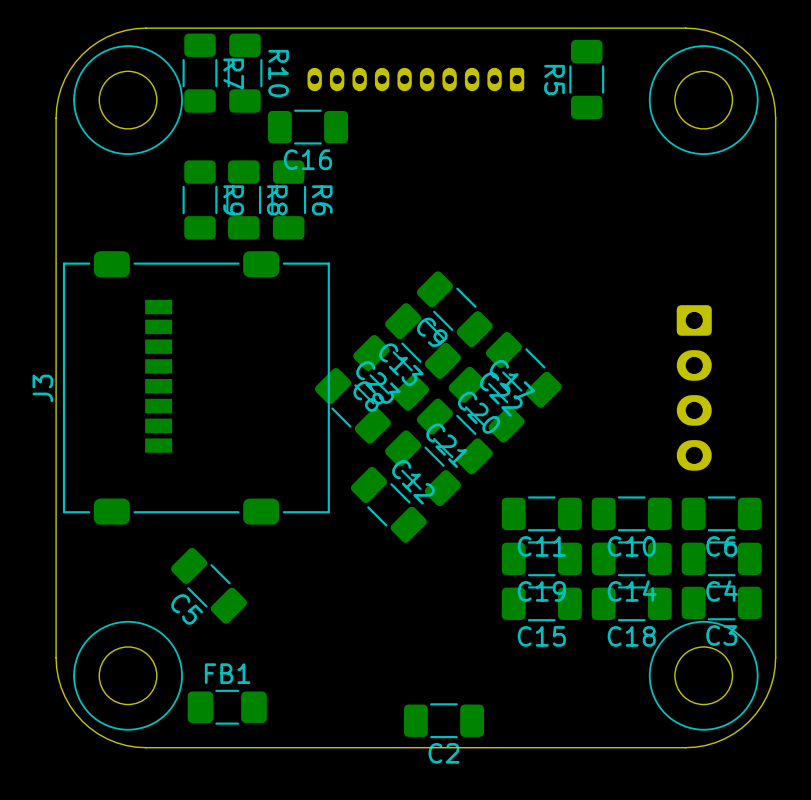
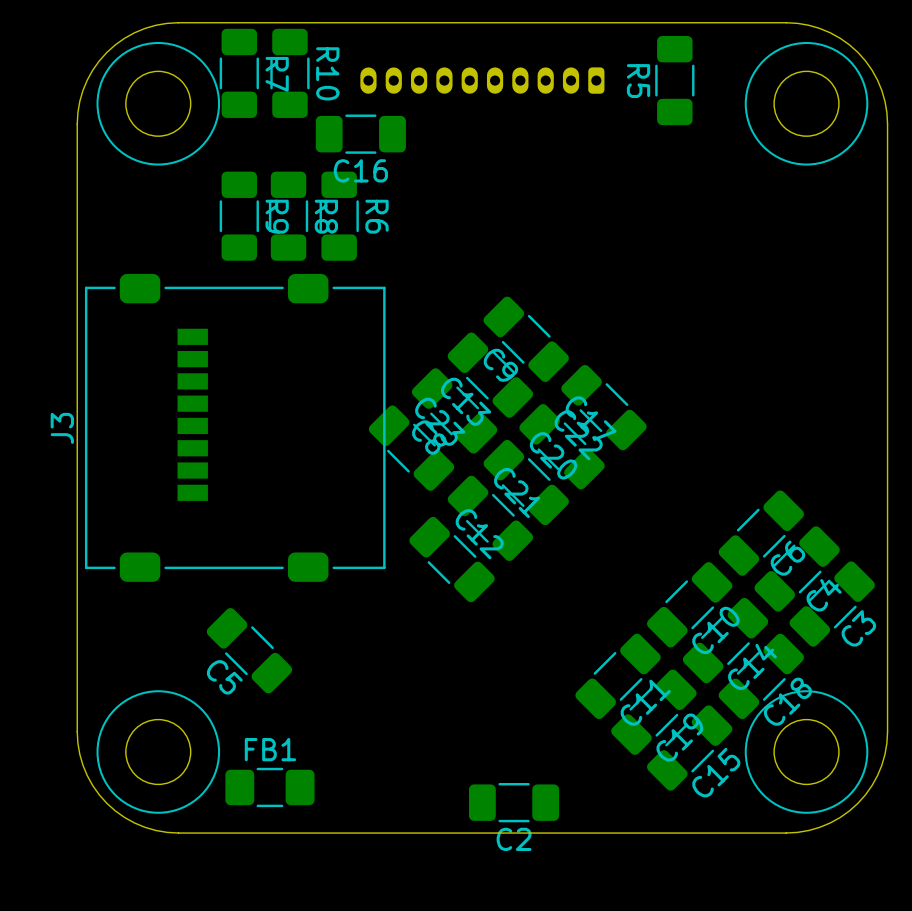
part: (694, 387) -> none
C11 rotation: 0° (541, 513) -> 45° counterclockwise (618, 676)
C11 position: (541, 513) -> (618, 676)
C10 rotation: 0° (631, 513) -> 45° counterclockwise (689, 604)
C6 rotation: 0° (721, 513) -> 45° counterclockwise (761, 533)
C6 position: (721, 513) -> (761, 533)
C19 rotation: 0° (541, 558) -> 45° counterclockwise (653, 712)
C19 position: (541, 558) -> (653, 712)
C14 rotation: 0° (631, 558) -> 45° counterclockwise (725, 640)
C4 rotation: 0° (721, 558) -> 45° counterclockwise (797, 568)
C4 position: (721, 558) -> (797, 568)
C3 rotation: 0° (721, 602) -> 45° counterclockwise (832, 604)
C3 position: (721, 602) -> (832, 604)
C15 rotation: 0° (541, 603) -> 45° counterclockwise (689, 748)
C15 position: (541, 603) -> (689, 748)
C18 rotation: 0° (631, 603) -> 45° counterclockwise (761, 676)

